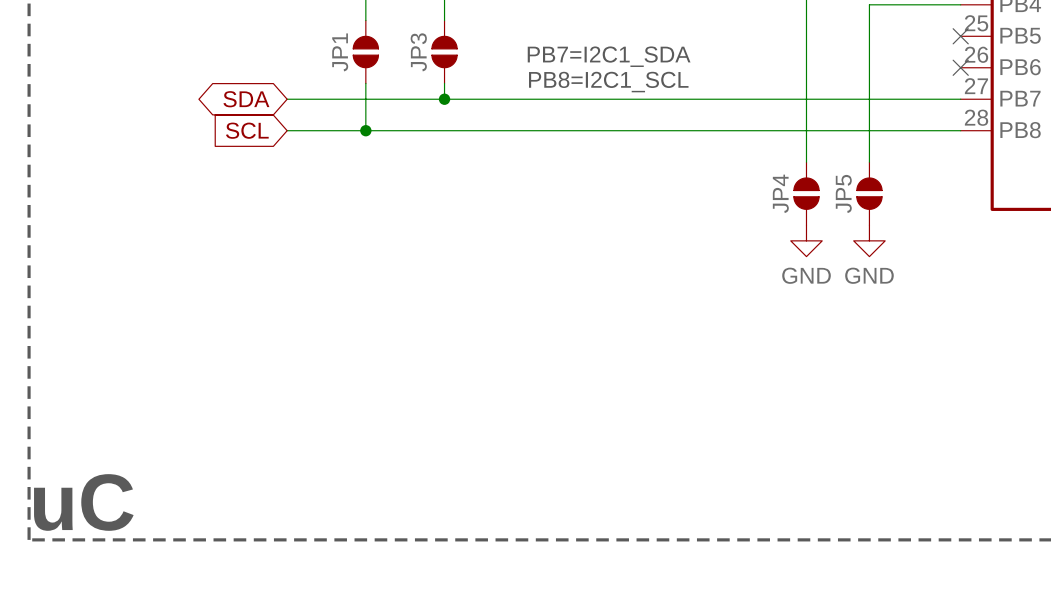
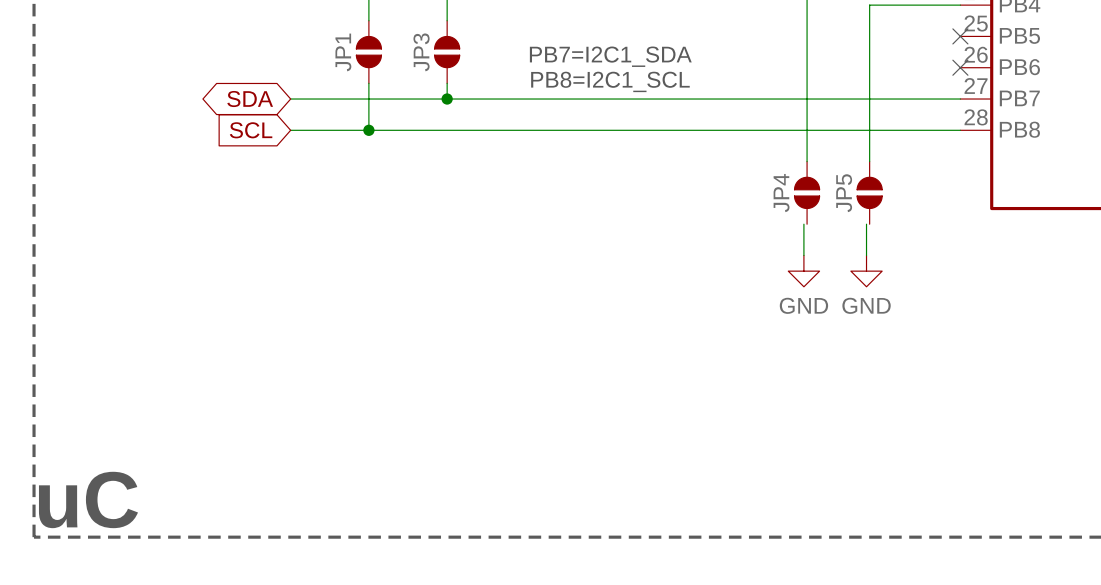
wire: none -> (803, 224) (803, 255)
wire: none -> (866, 224) (866, 255)
power symbol position: GND (806, 240) -> GND (803, 271)
power symbol position: GND (869, 240) -> GND (866, 271)

